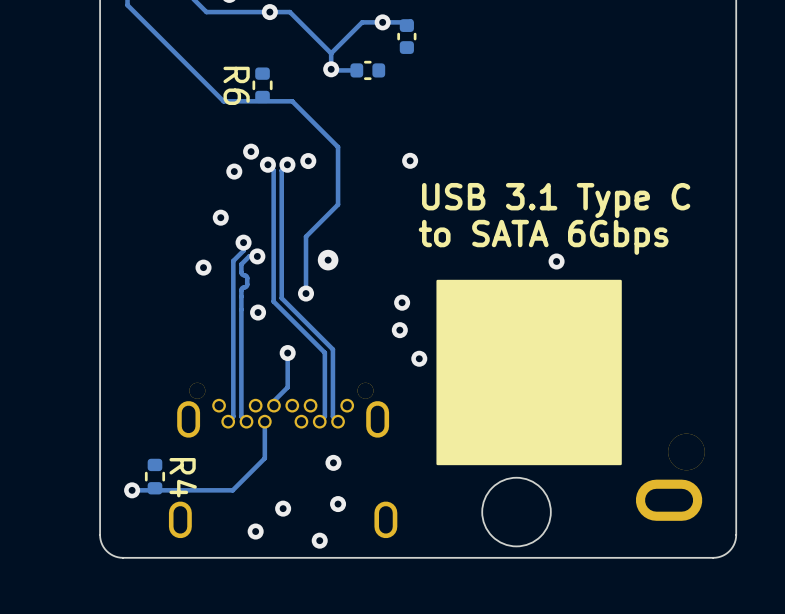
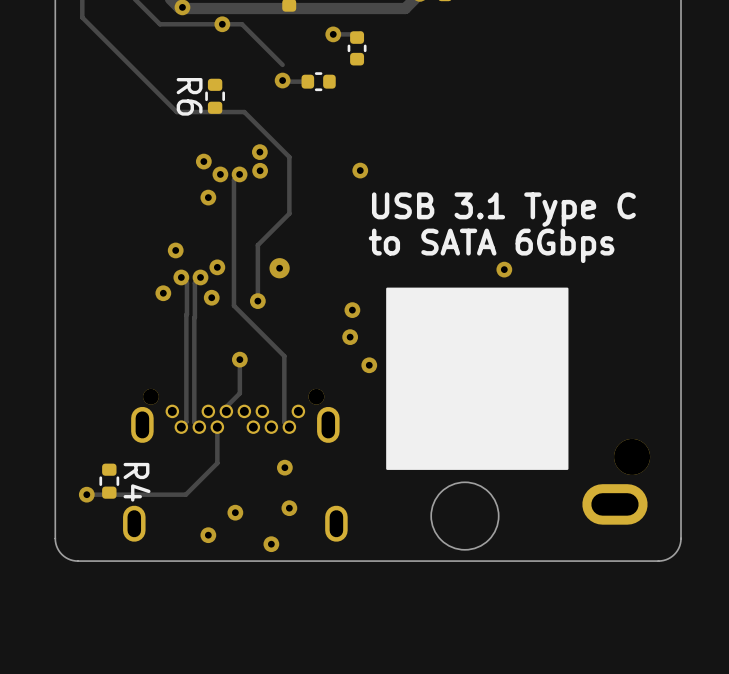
track: (382, 22) (362, 22) (331, 53) (331, 69) -> none
via: none -> (259, 152)
track: (267, 164) (273, 170) (273, 301) (324, 352) (324, 416) (319, 421) -> none
via: (234, 171) -> none
via: none -> (208, 197)
via: (220, 217) -> none
via: none -> (175, 250)
track: (243, 242) (243, 250) (233, 260) (233, 307) -> (181, 277) (186, 283) (186, 314)
via: (243, 242) -> none
track: (257, 256) (249, 256) (241, 264) (241, 273) (247, 278) (246, 285) (241, 289) (241, 310) -> (200, 277) (194, 283) (194, 317)
via: (257, 256) -> none
via: none -> (217, 267)
via: (203, 267) -> none
via: none -> (181, 277)
via: none -> (200, 277)
via: none -> (163, 293)
via: none -> (211, 297)
via: (258, 312) -> none

